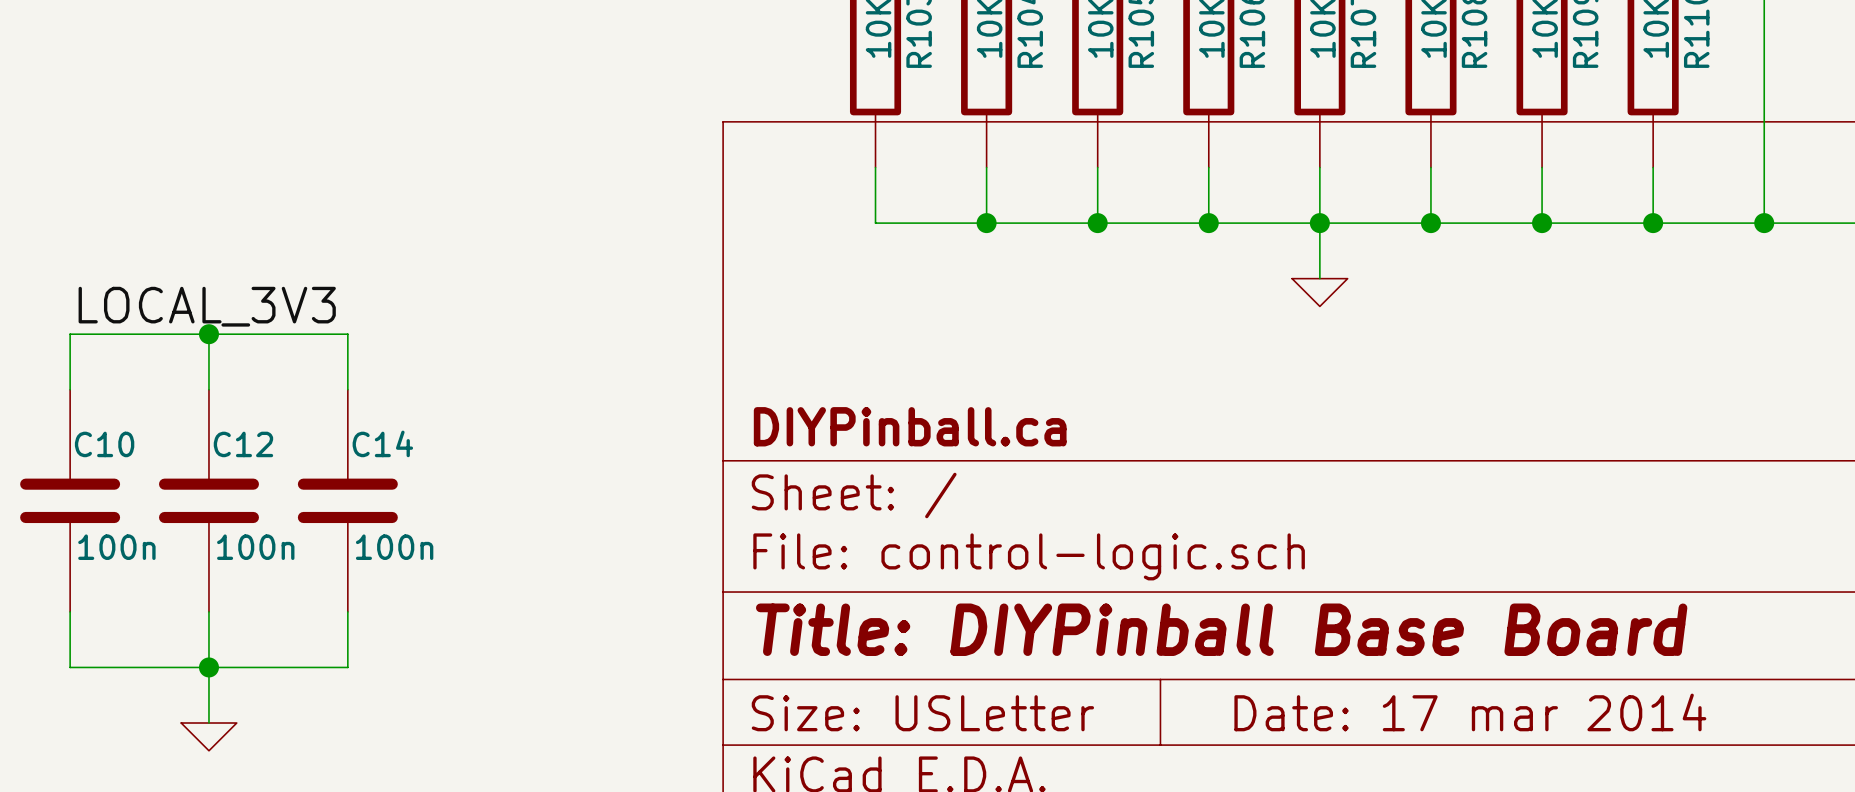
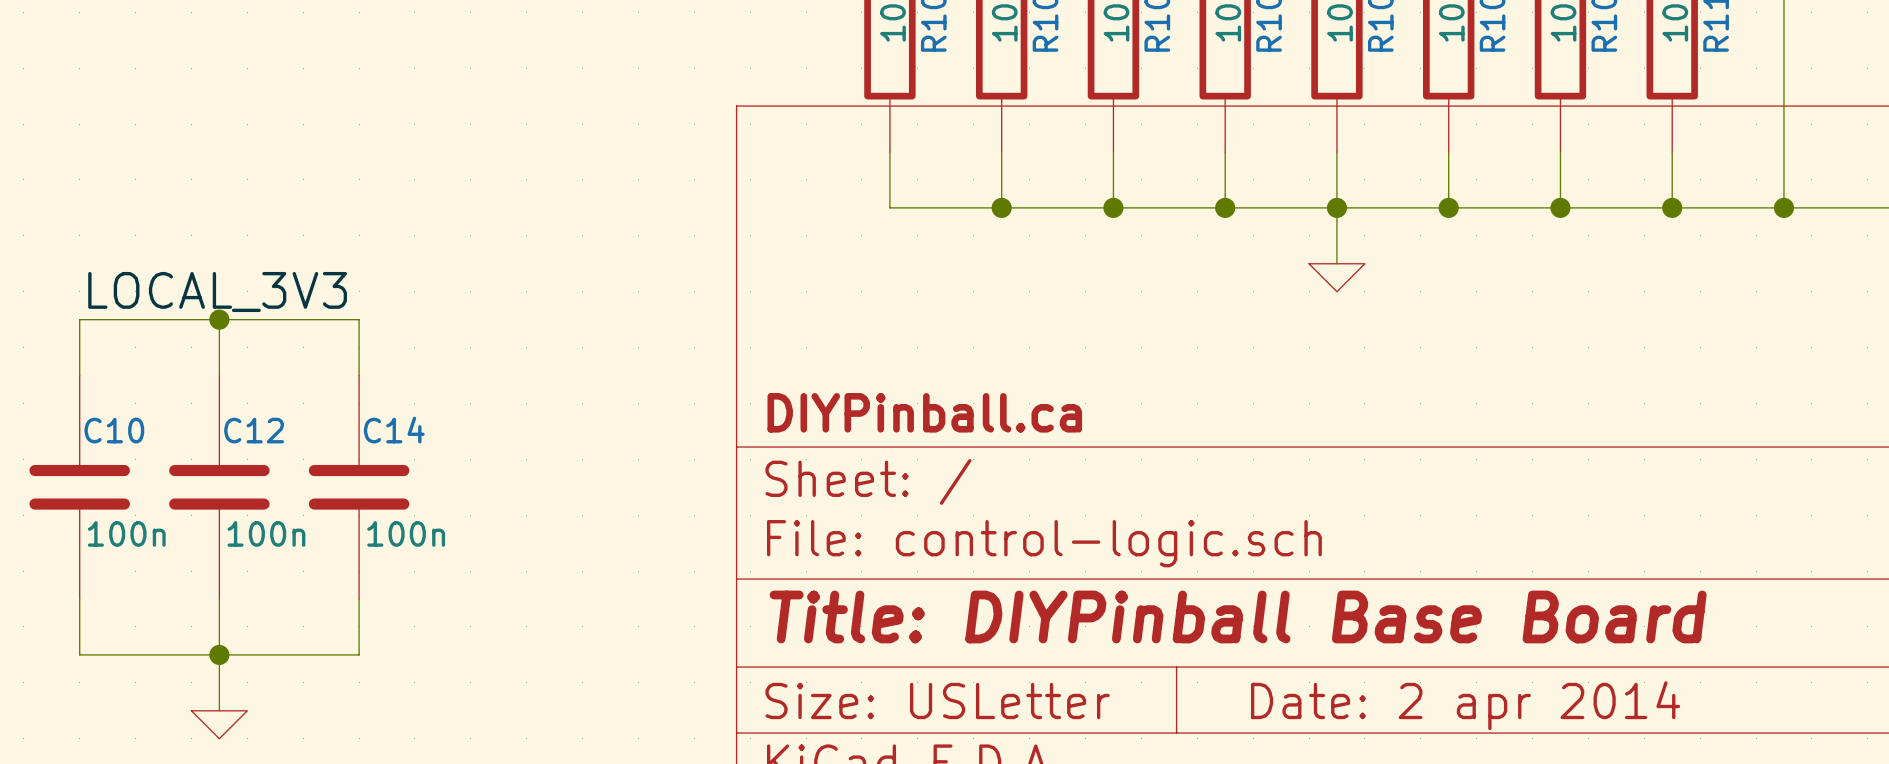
title block: Date: 17 mar 2014 (1470, 712) -> Date: 2 apr 2014 (1465, 705)

